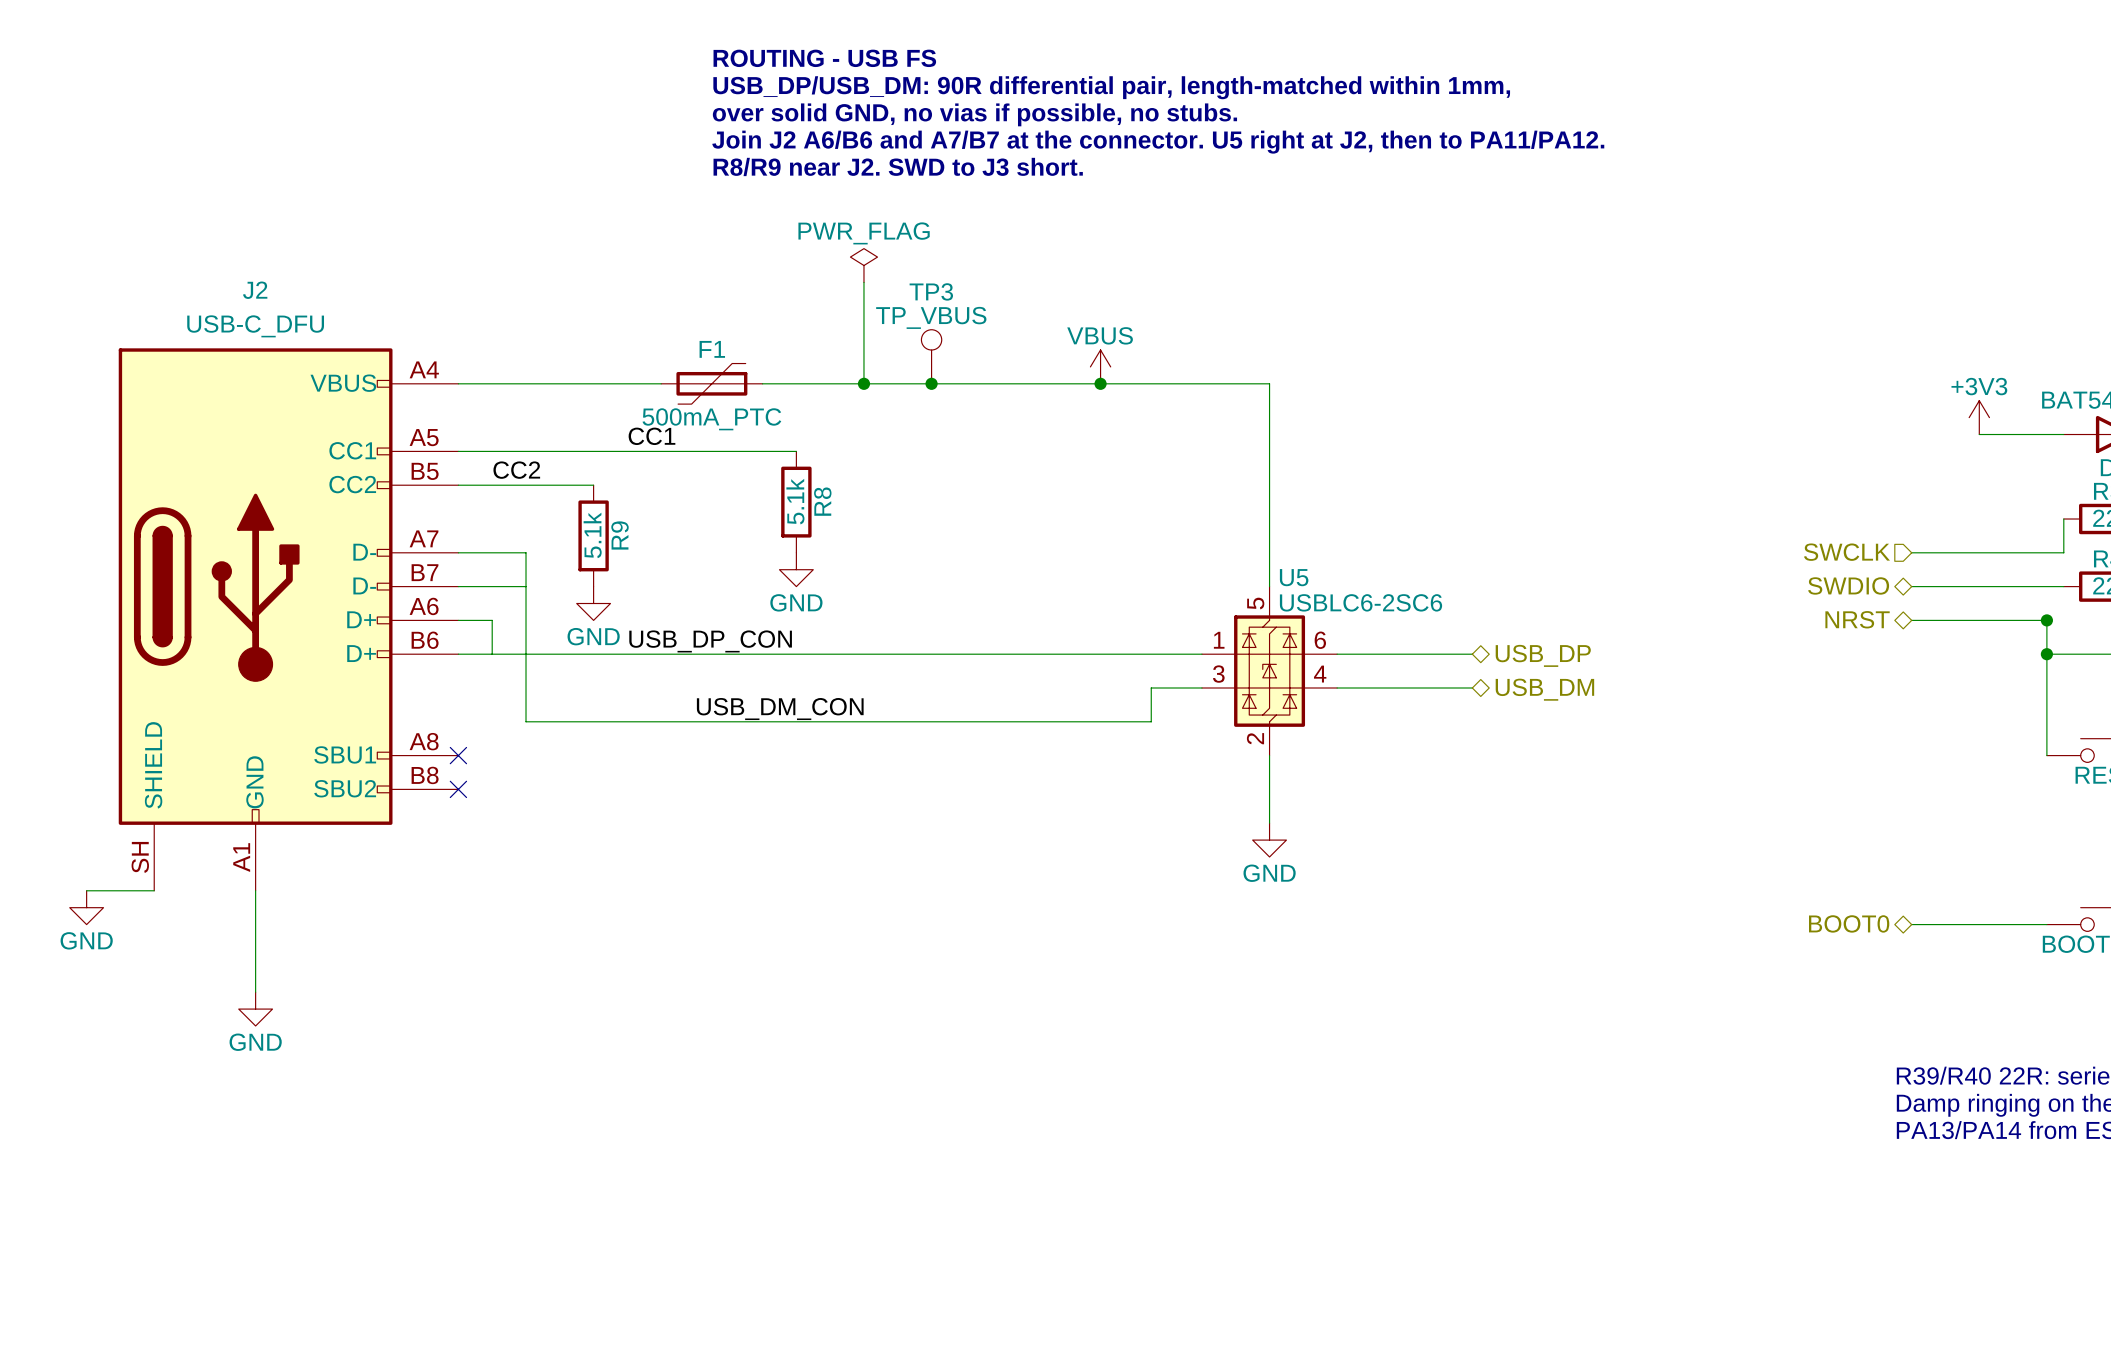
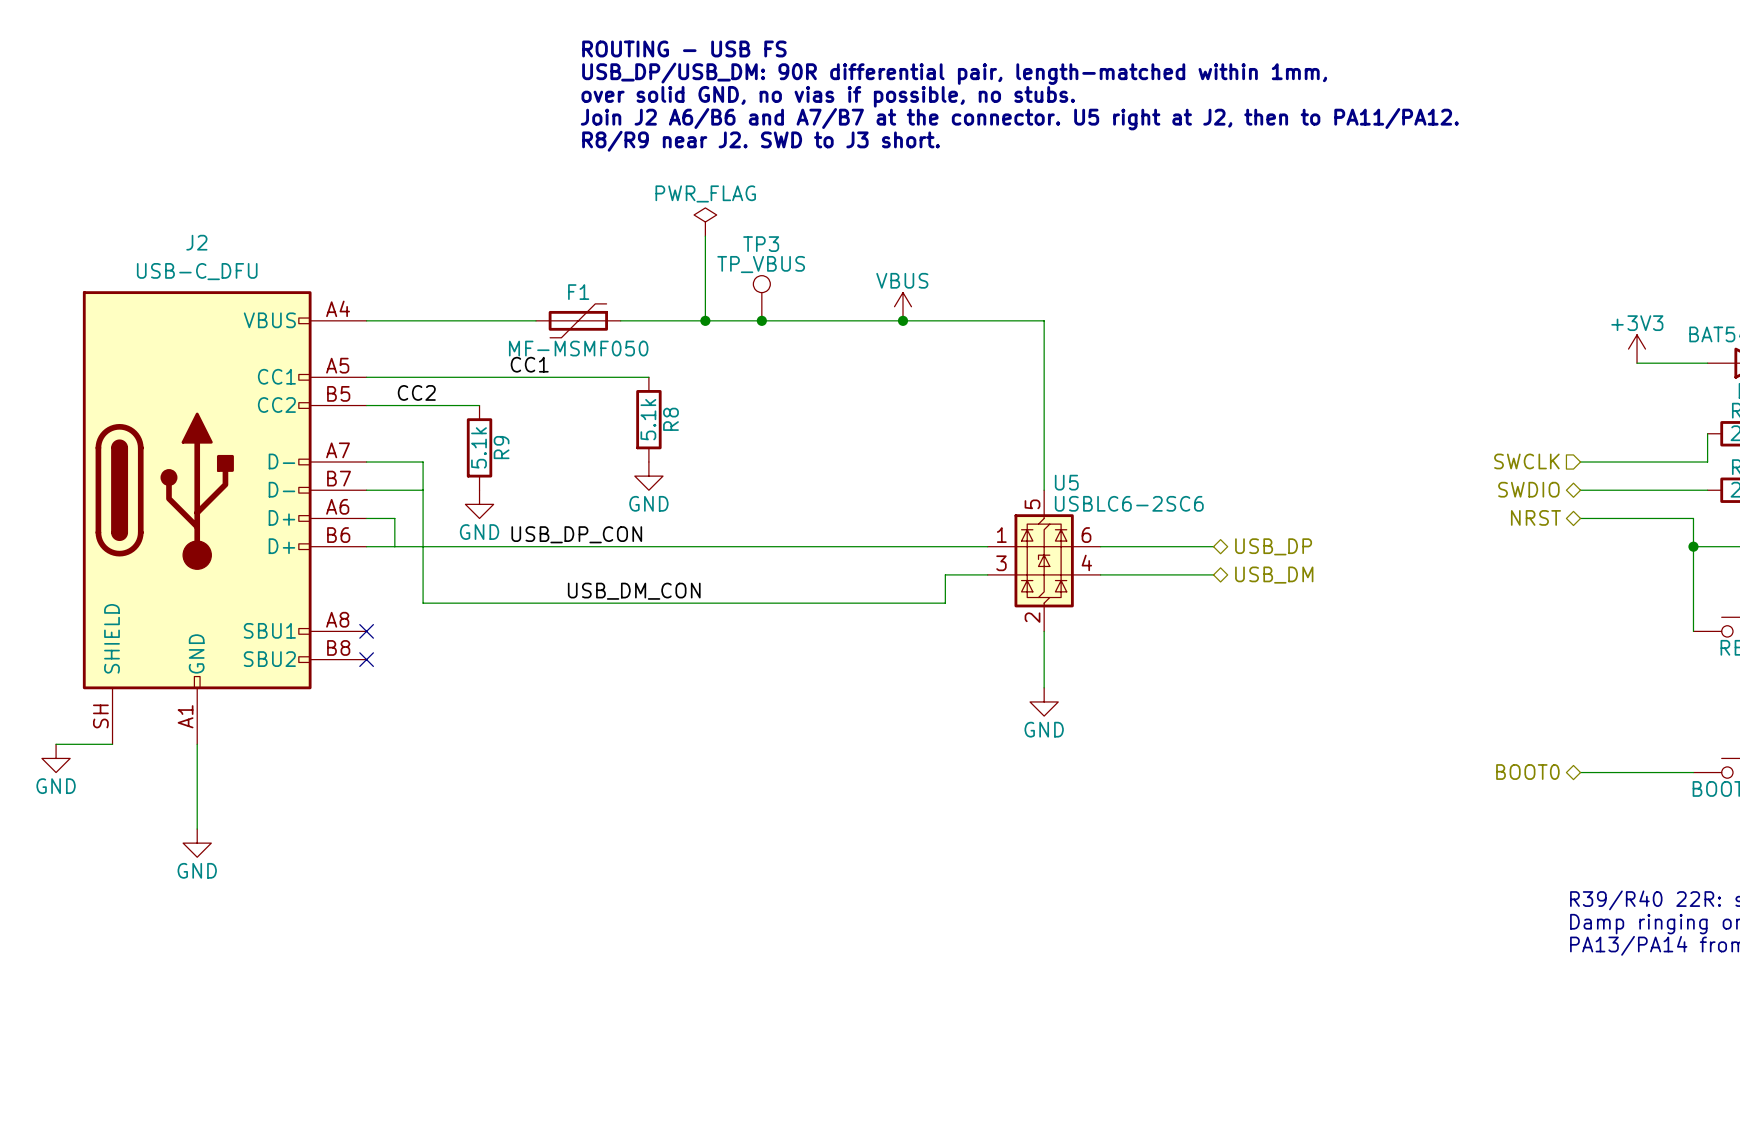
F1 value: 500mA_PTC (711, 419) -> MF-MSMF050 (578, 348)
junction: (2046, 620) -> none

